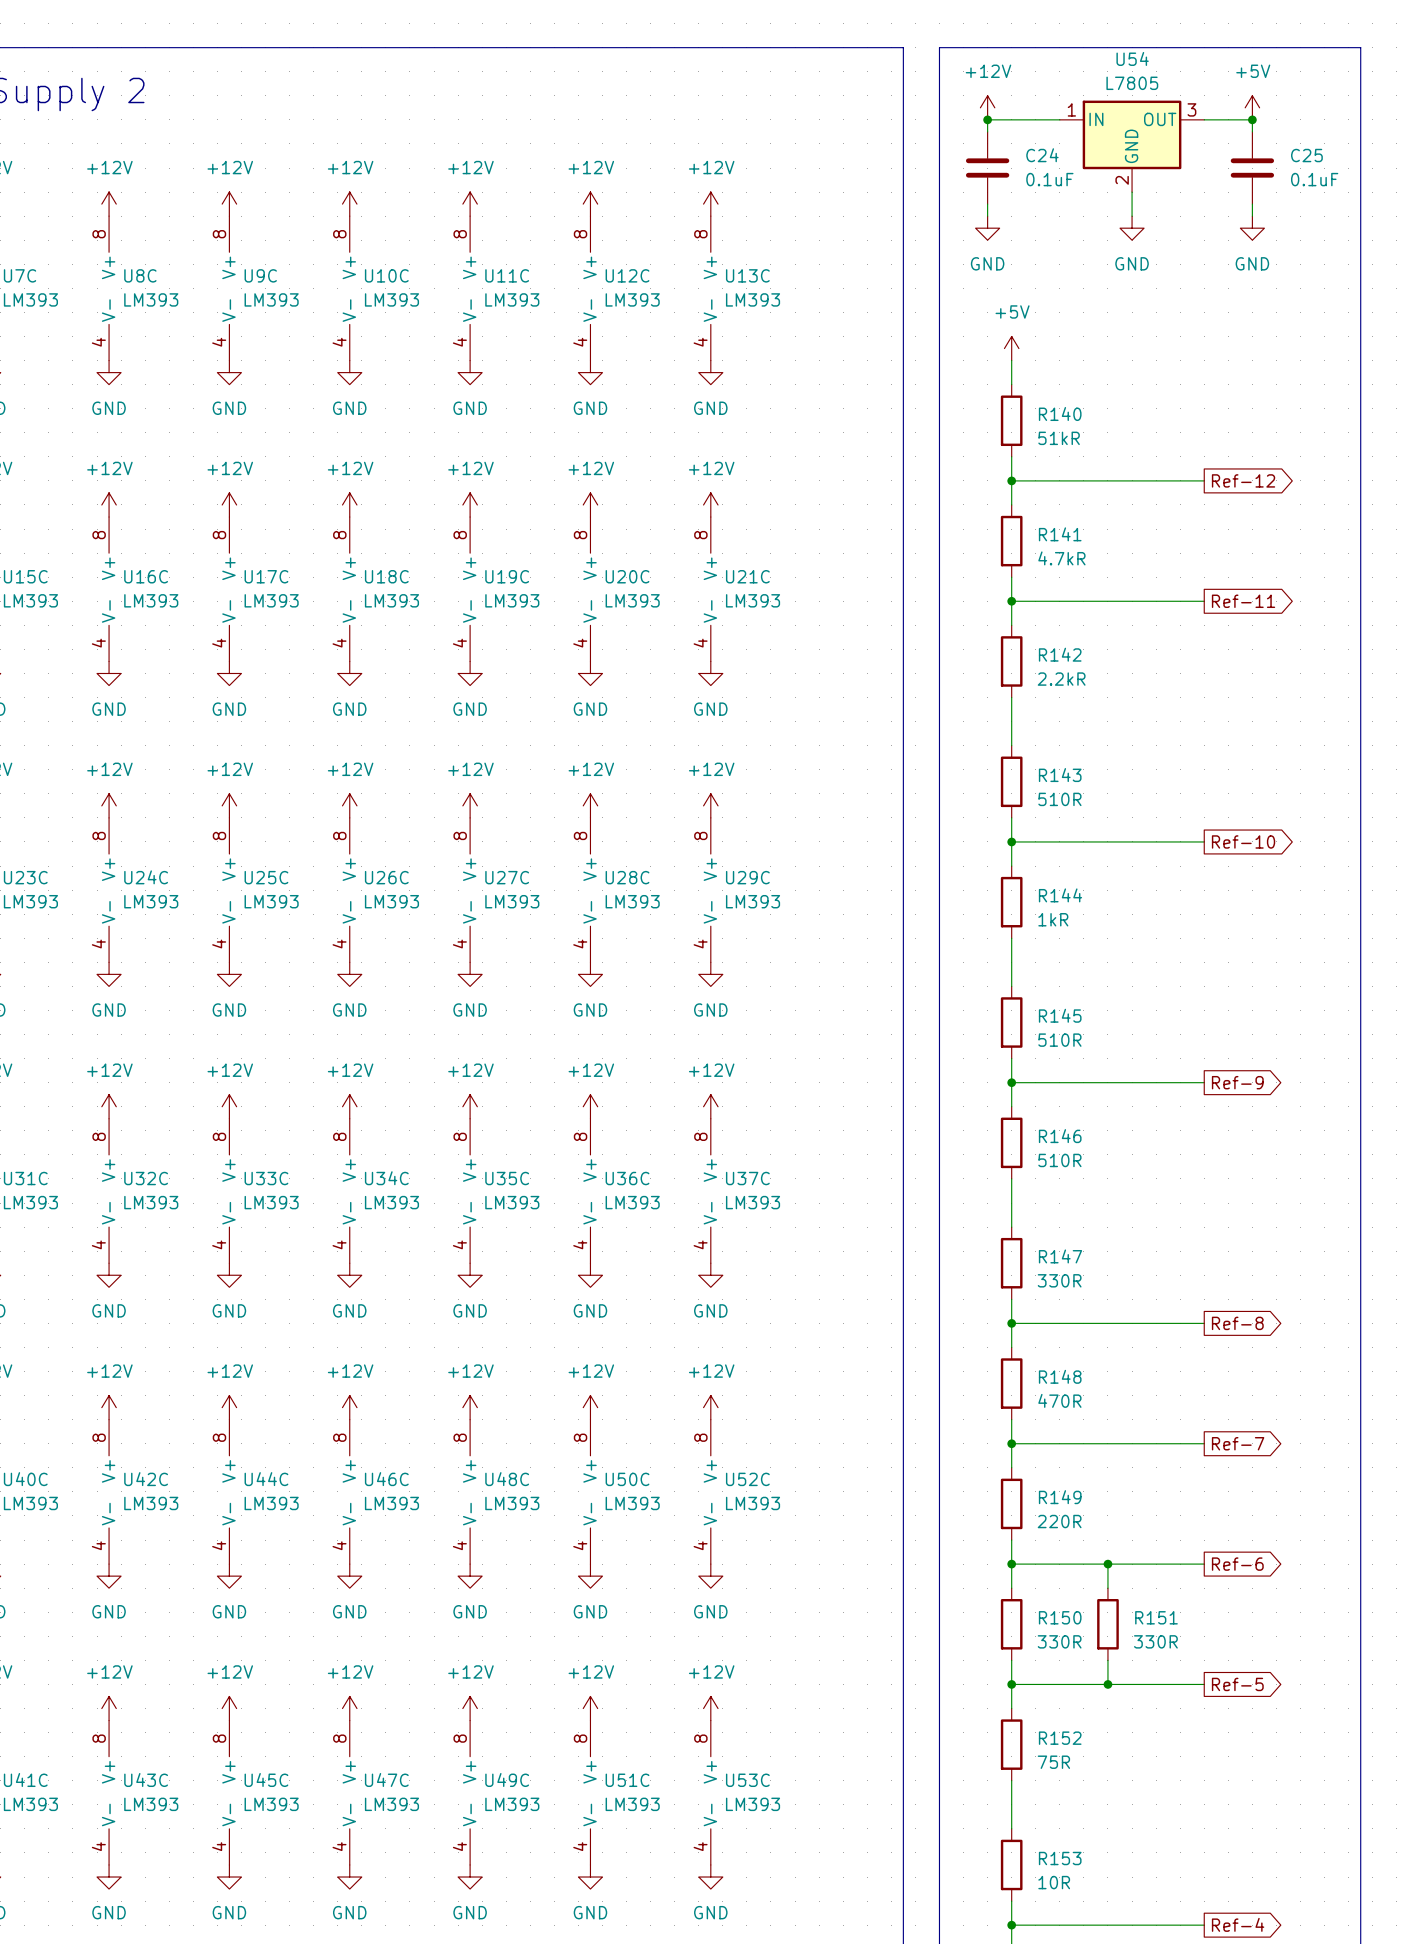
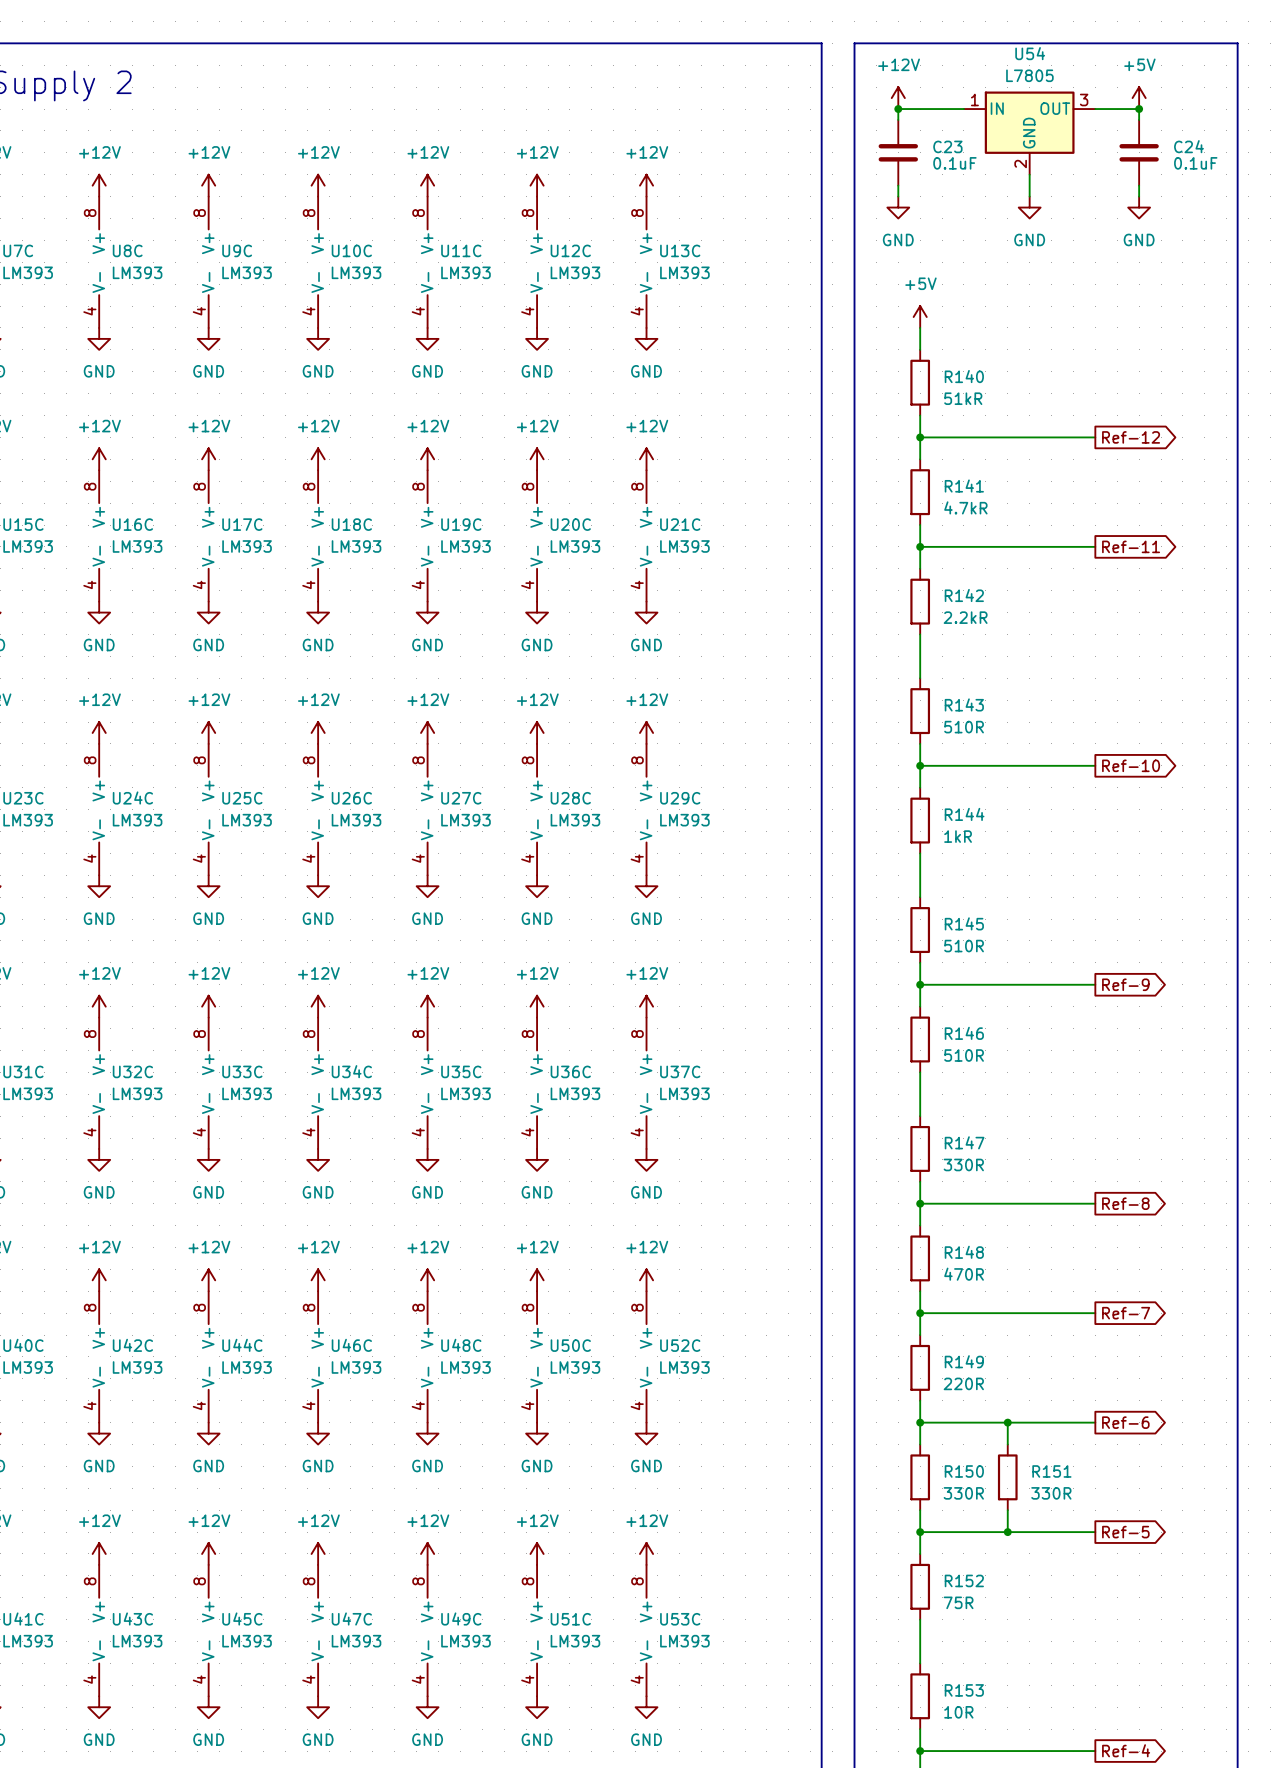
C24 name: C24 (1042, 155) -> C23 (947, 146)
C25 name: C25 (1306, 155) -> C24 (1188, 146)

